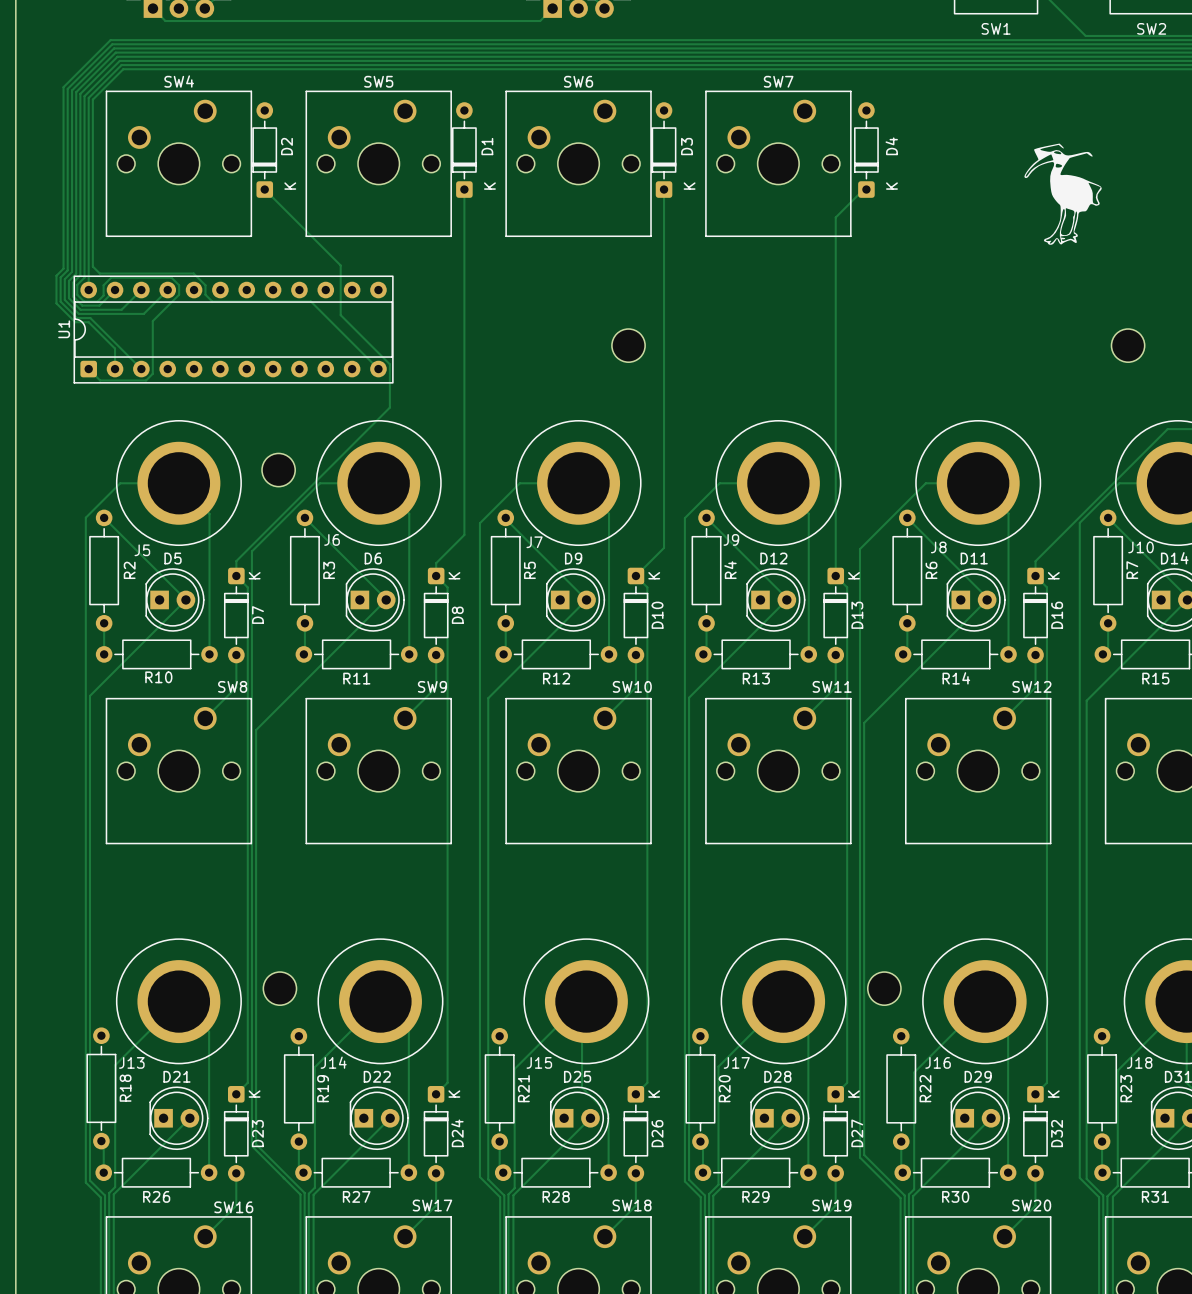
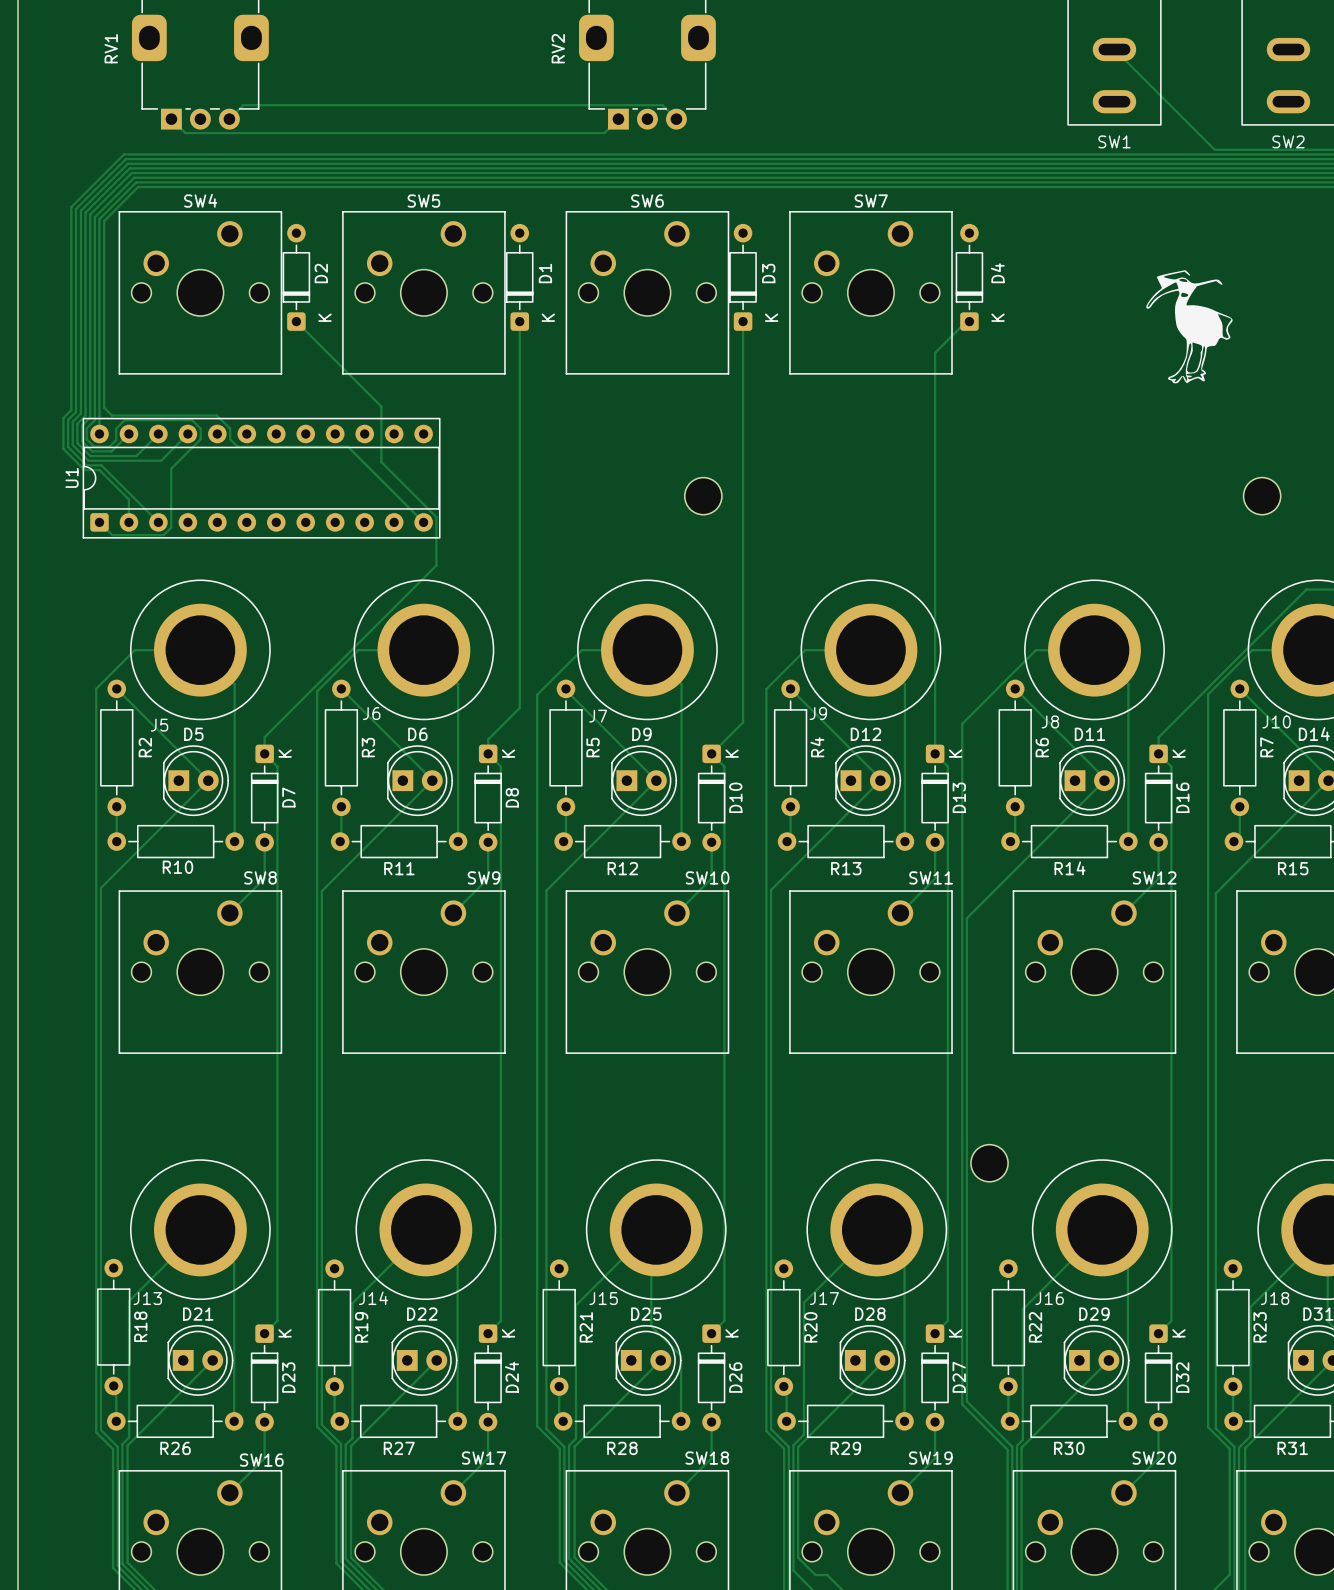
part: (278, 470) -> none
track: (283, 520) (251, 551) (251, 1146) (283, 1177) -> (317, 691) (317, 1426)
track: (287, 698) (256, 730) (256, 1144) (287, 1175) -> (321, 891) (321, 1424)
part: (279, 988) -> none
part position: (884, 988) -> (989, 1163)

